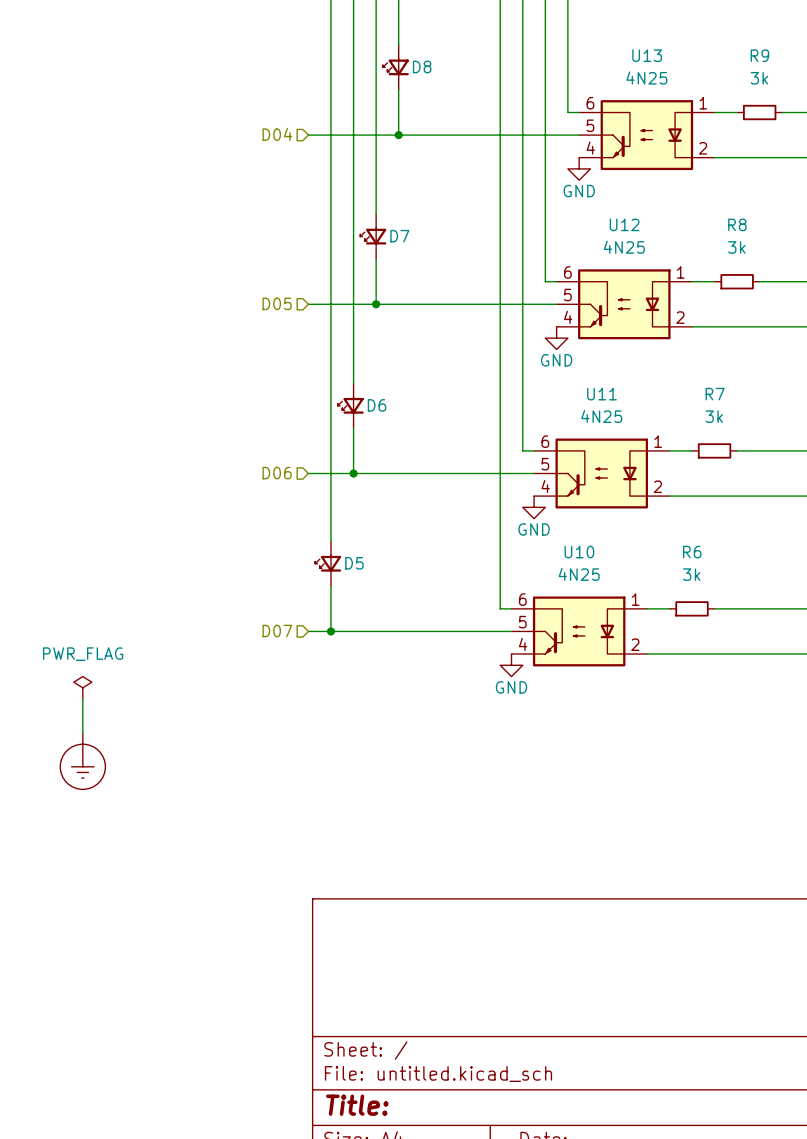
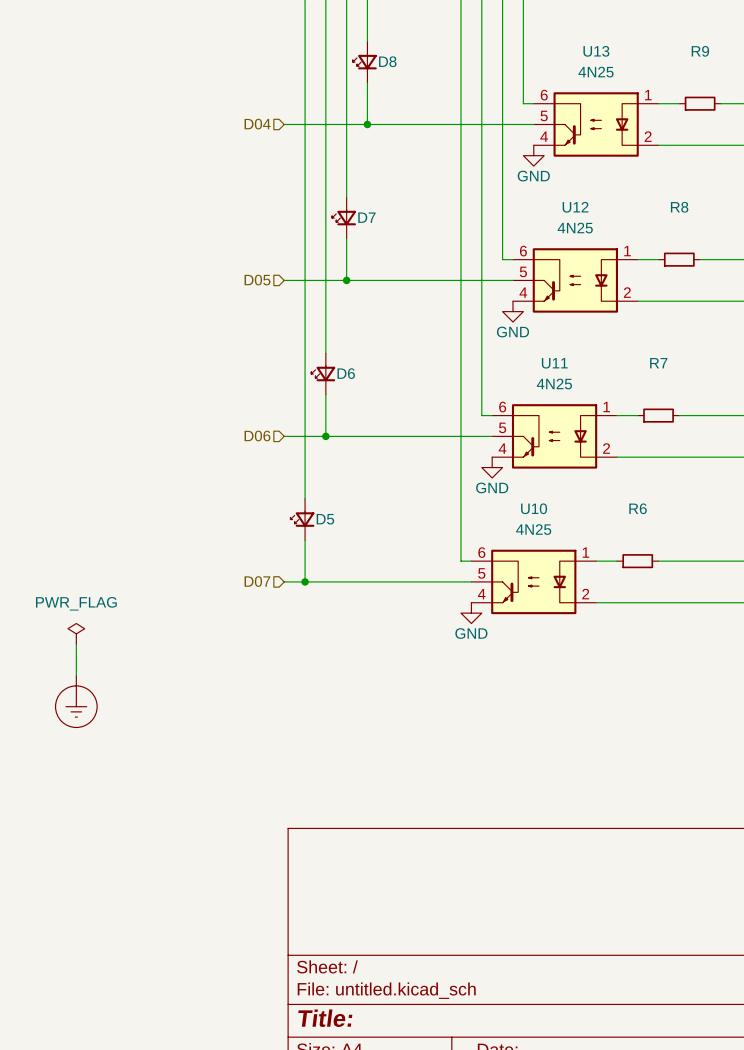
R9 value: 3k (759, 78) -> none
R8 value: 3k (736, 247) -> none
R7 value: 3k (714, 416) -> none
R6 value: 3k (691, 574) -> none

